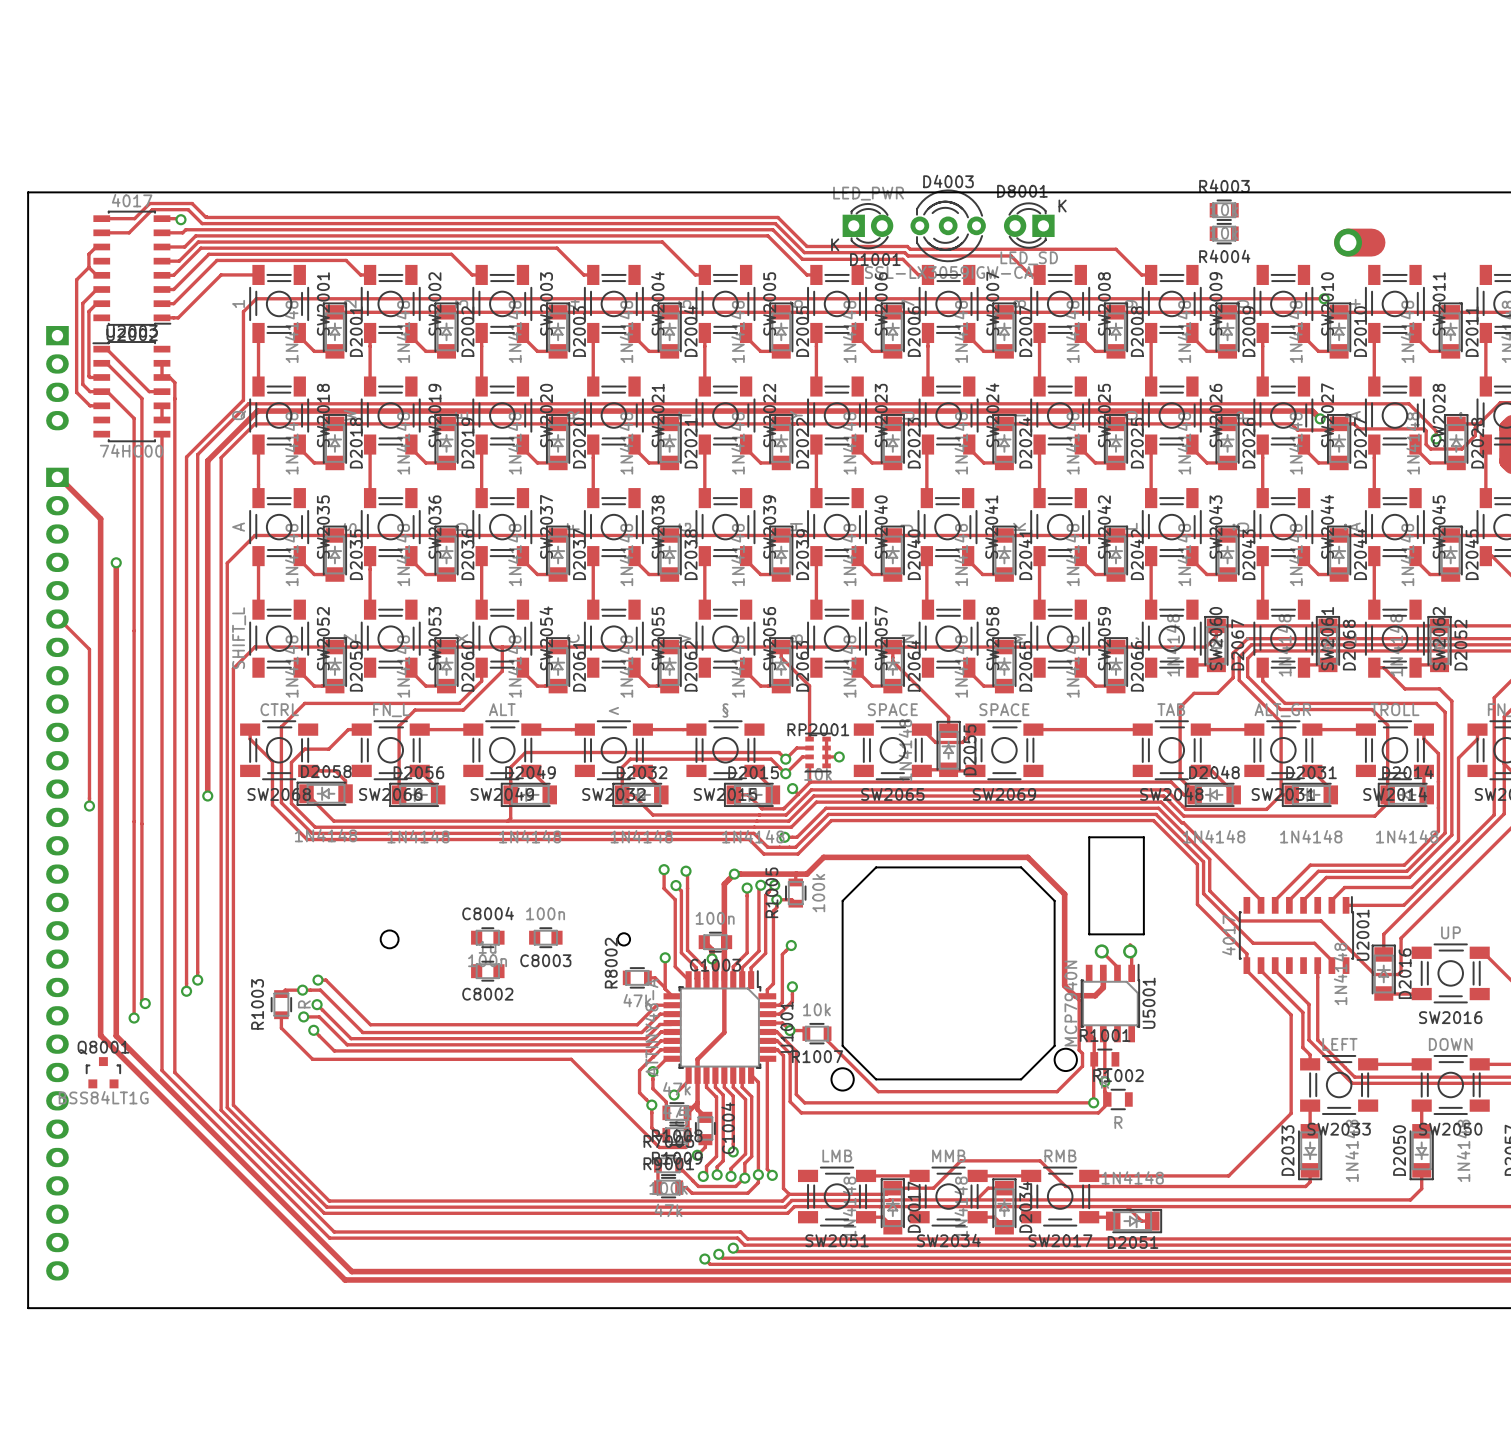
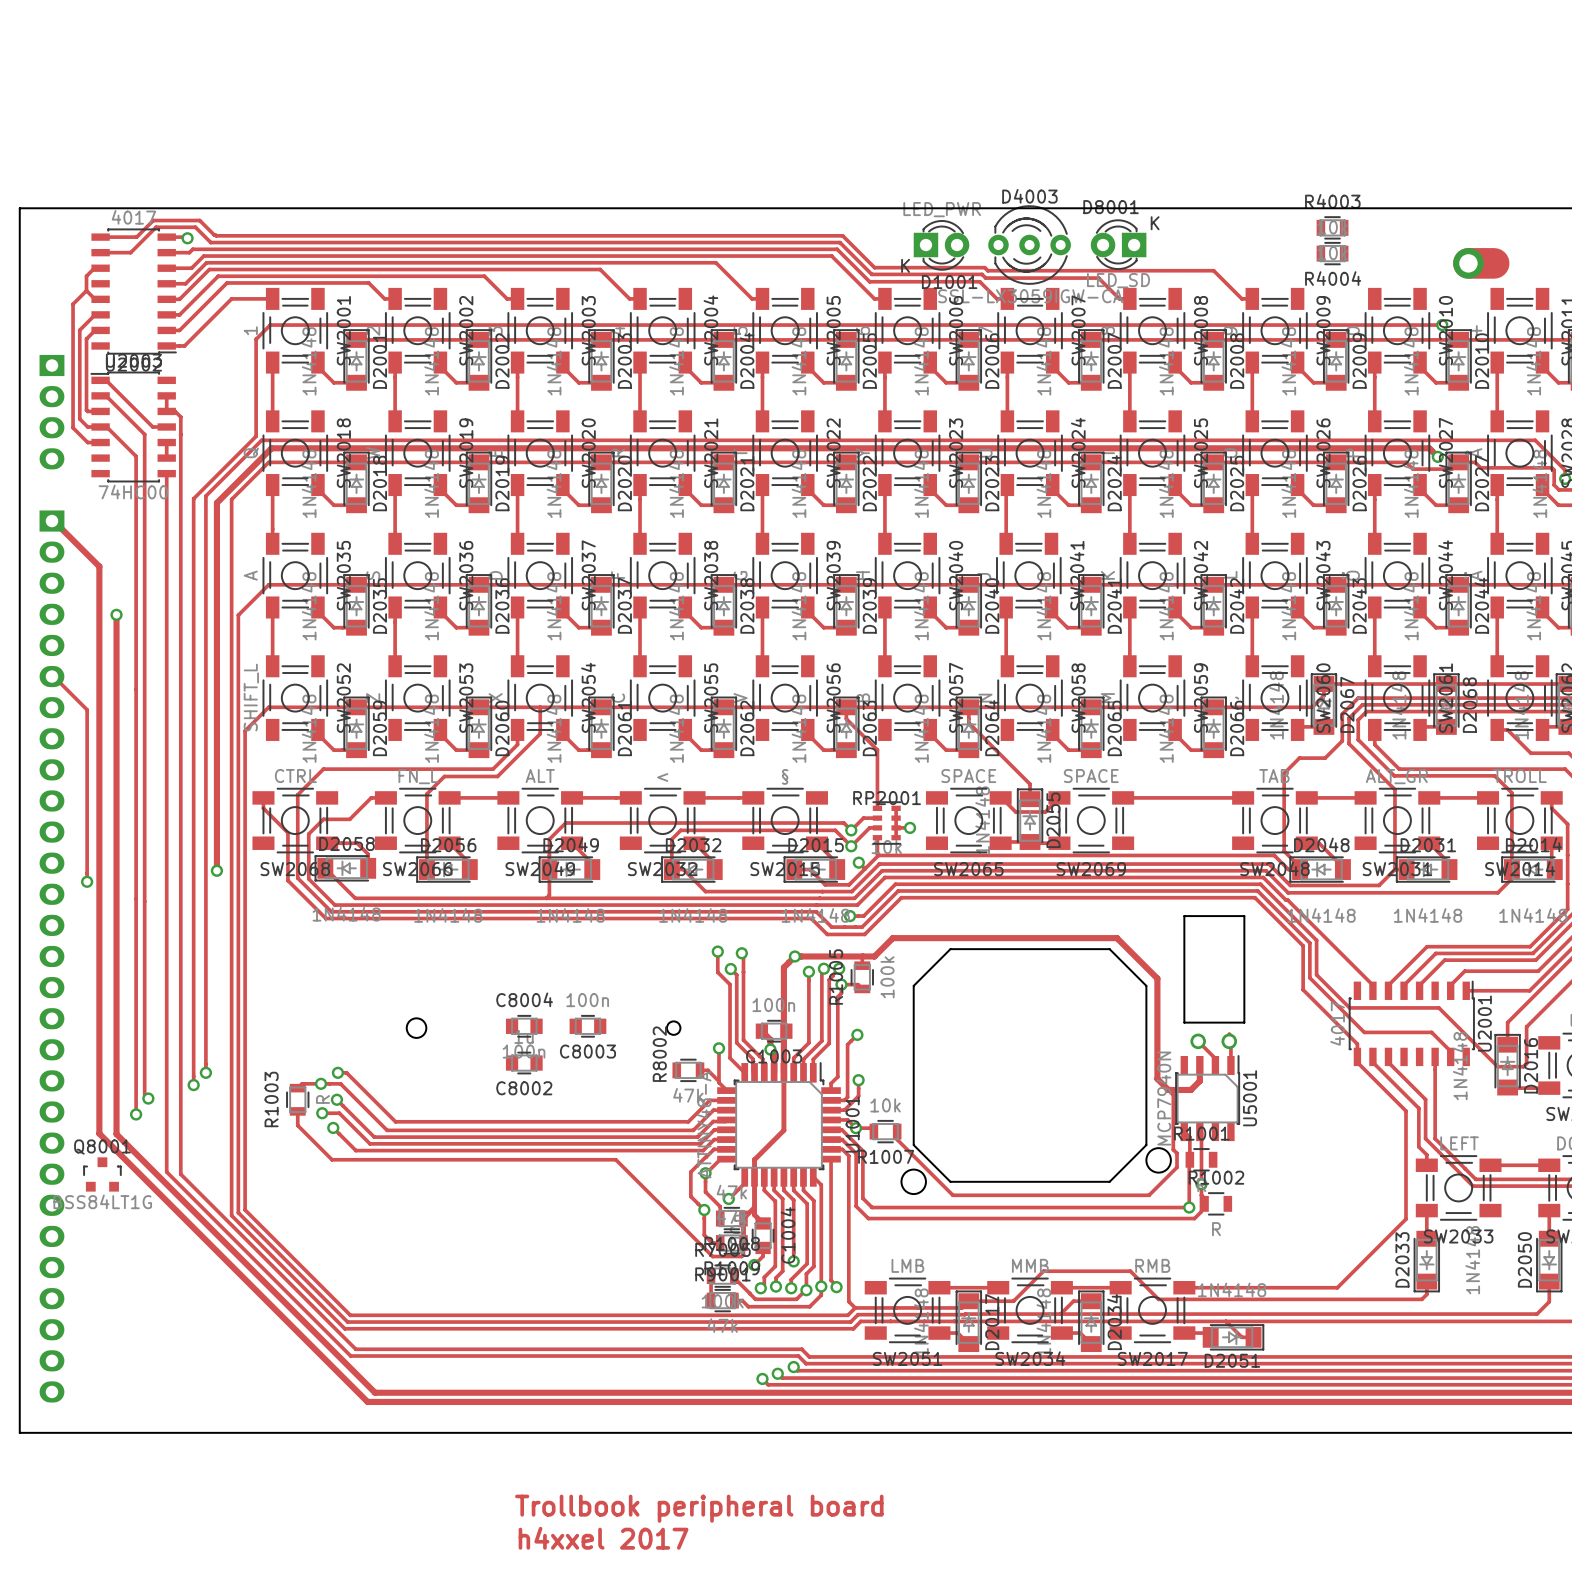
text: none -> Trollbook peripheral board (699, 1508)
text: none -> h4xxel 2017 (603, 1538)

